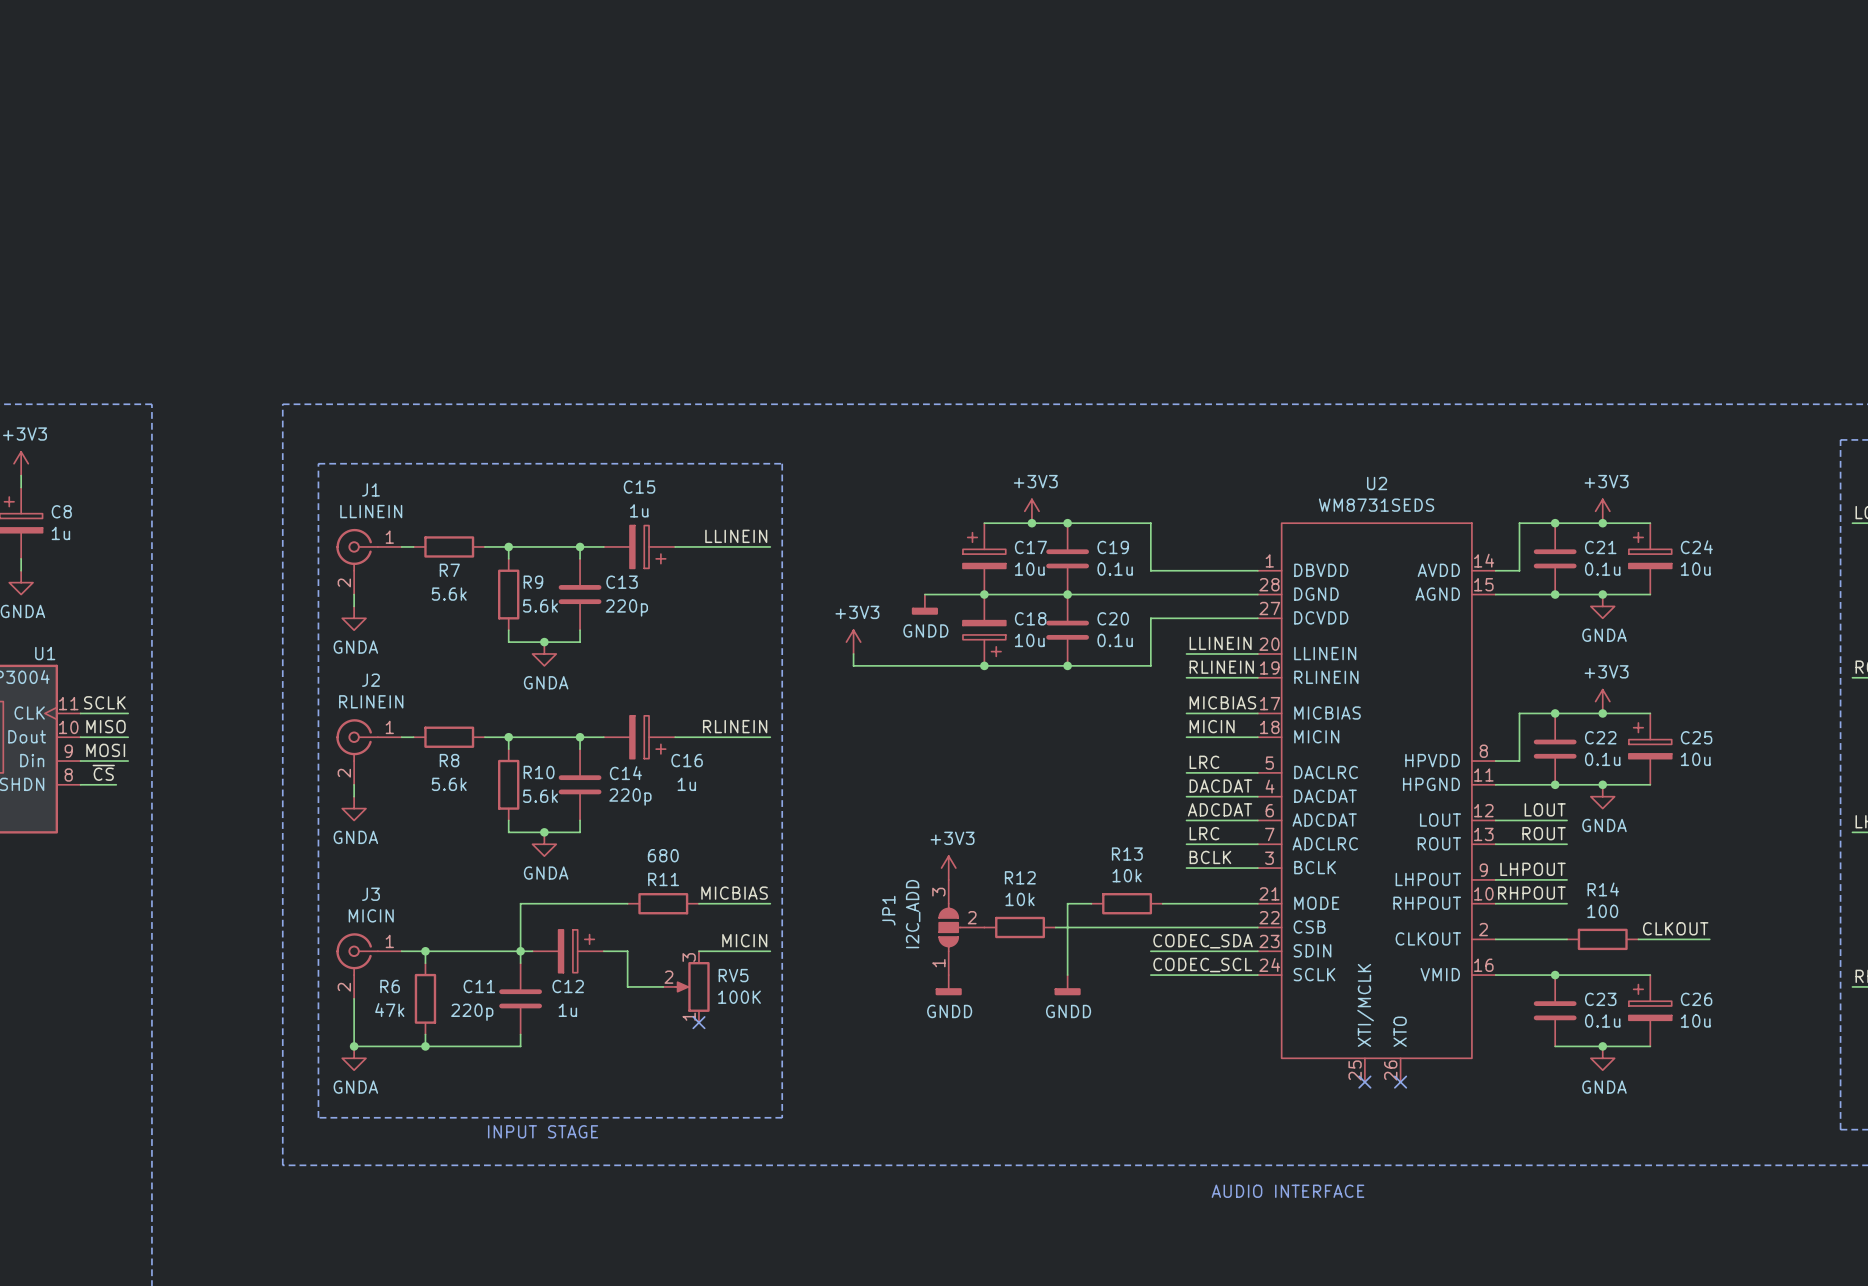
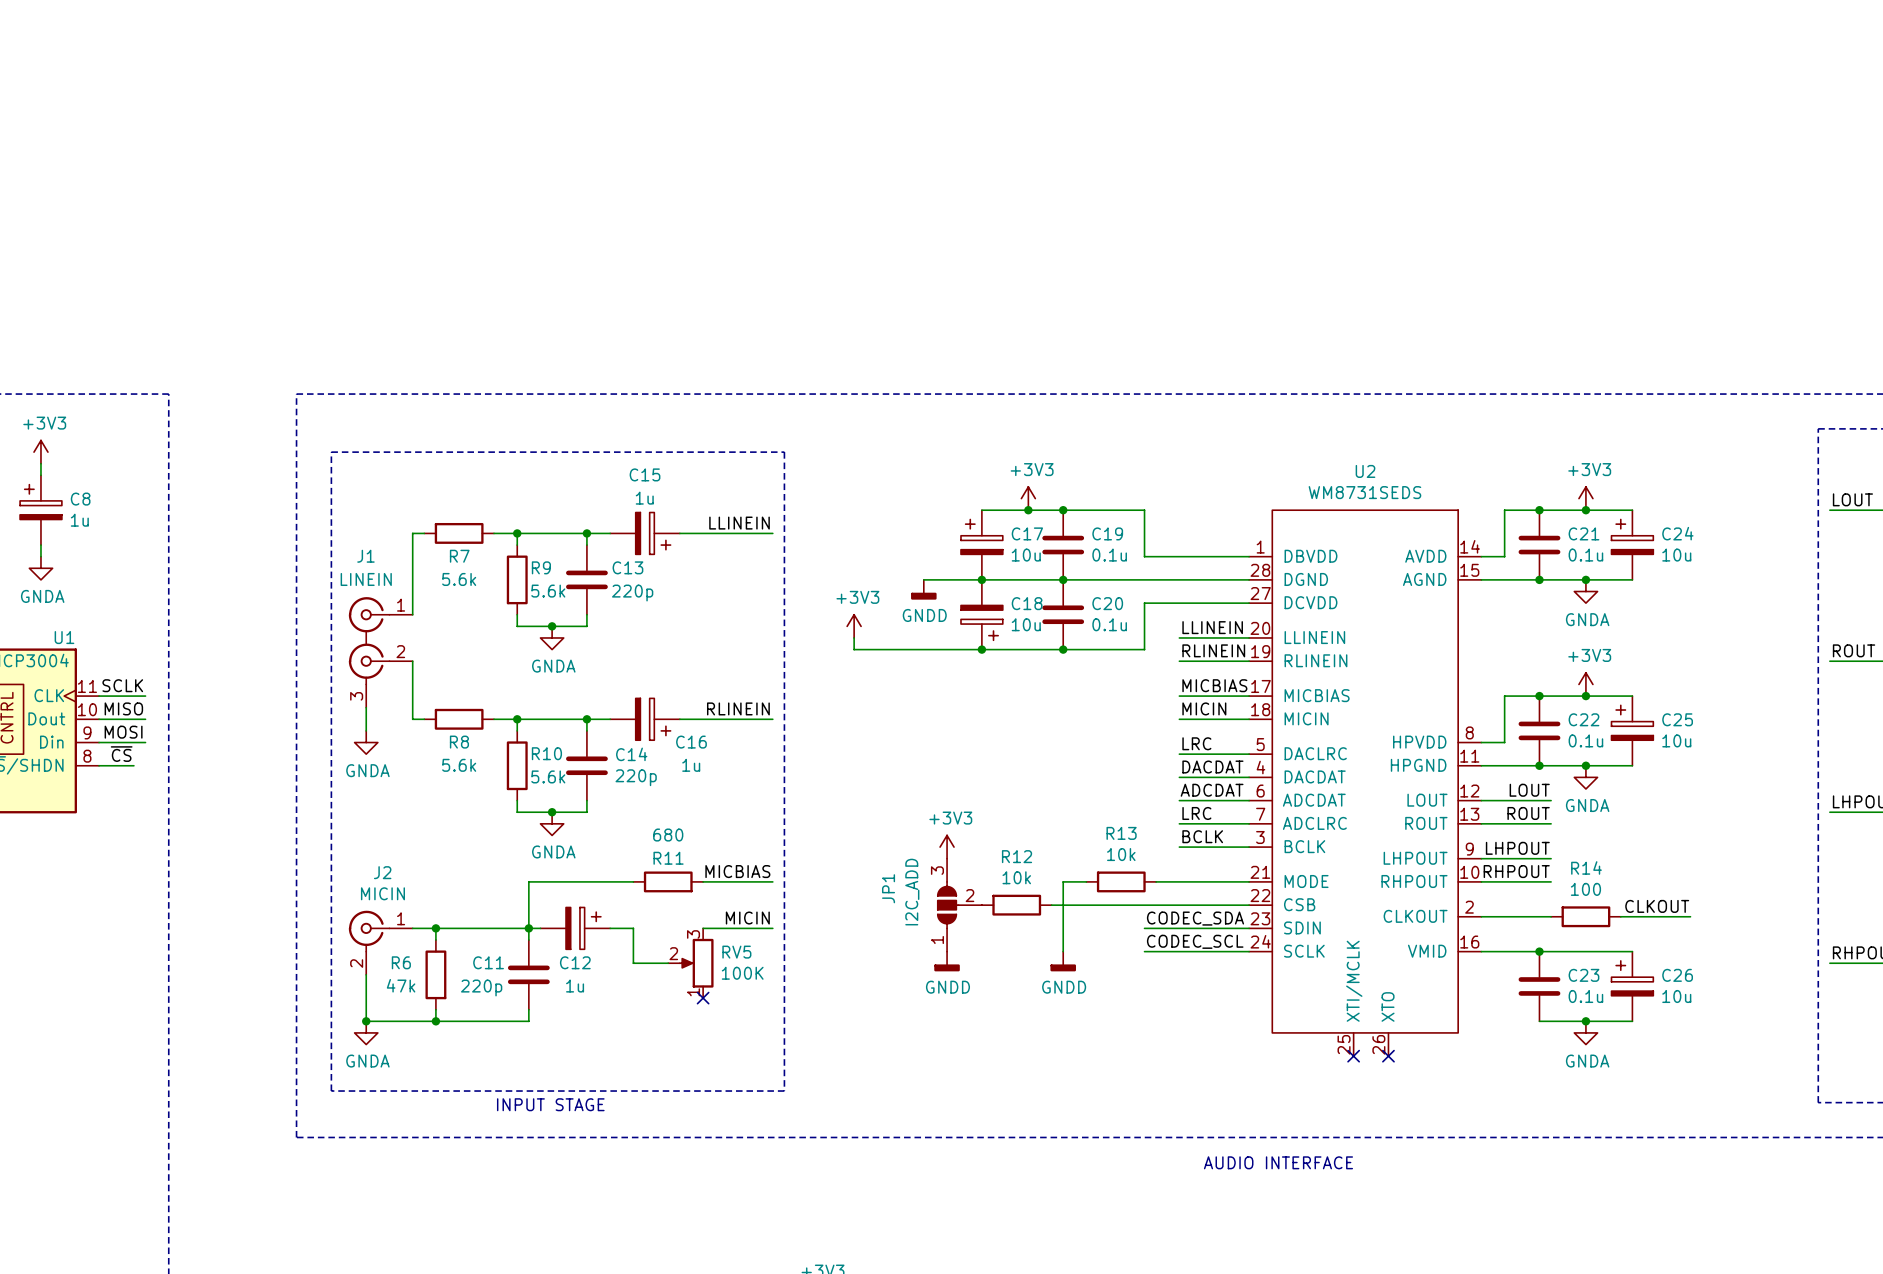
J1 name position: J1 (370, 489) -> J1 (365, 556)
J1 value: LLINEIN (371, 511) -> LINEIN (366, 579)
J1 symbol: [336, 528, 402, 595] -> [348, 597, 413, 708]
wire: none -> (412, 533) (412, 614)
wire: (354, 594) (354, 606) -> none
power symbol: GNDA (354, 618) -> none
wire: none -> (412, 661) (412, 719)
wire: none -> (366, 707) (366, 730)
J2: RLINEIN (368, 751) -> none
power symbol position: GNDA (354, 808) -> GNDA (366, 742)
J3 name: J3 (370, 894) -> J2 (382, 872)

